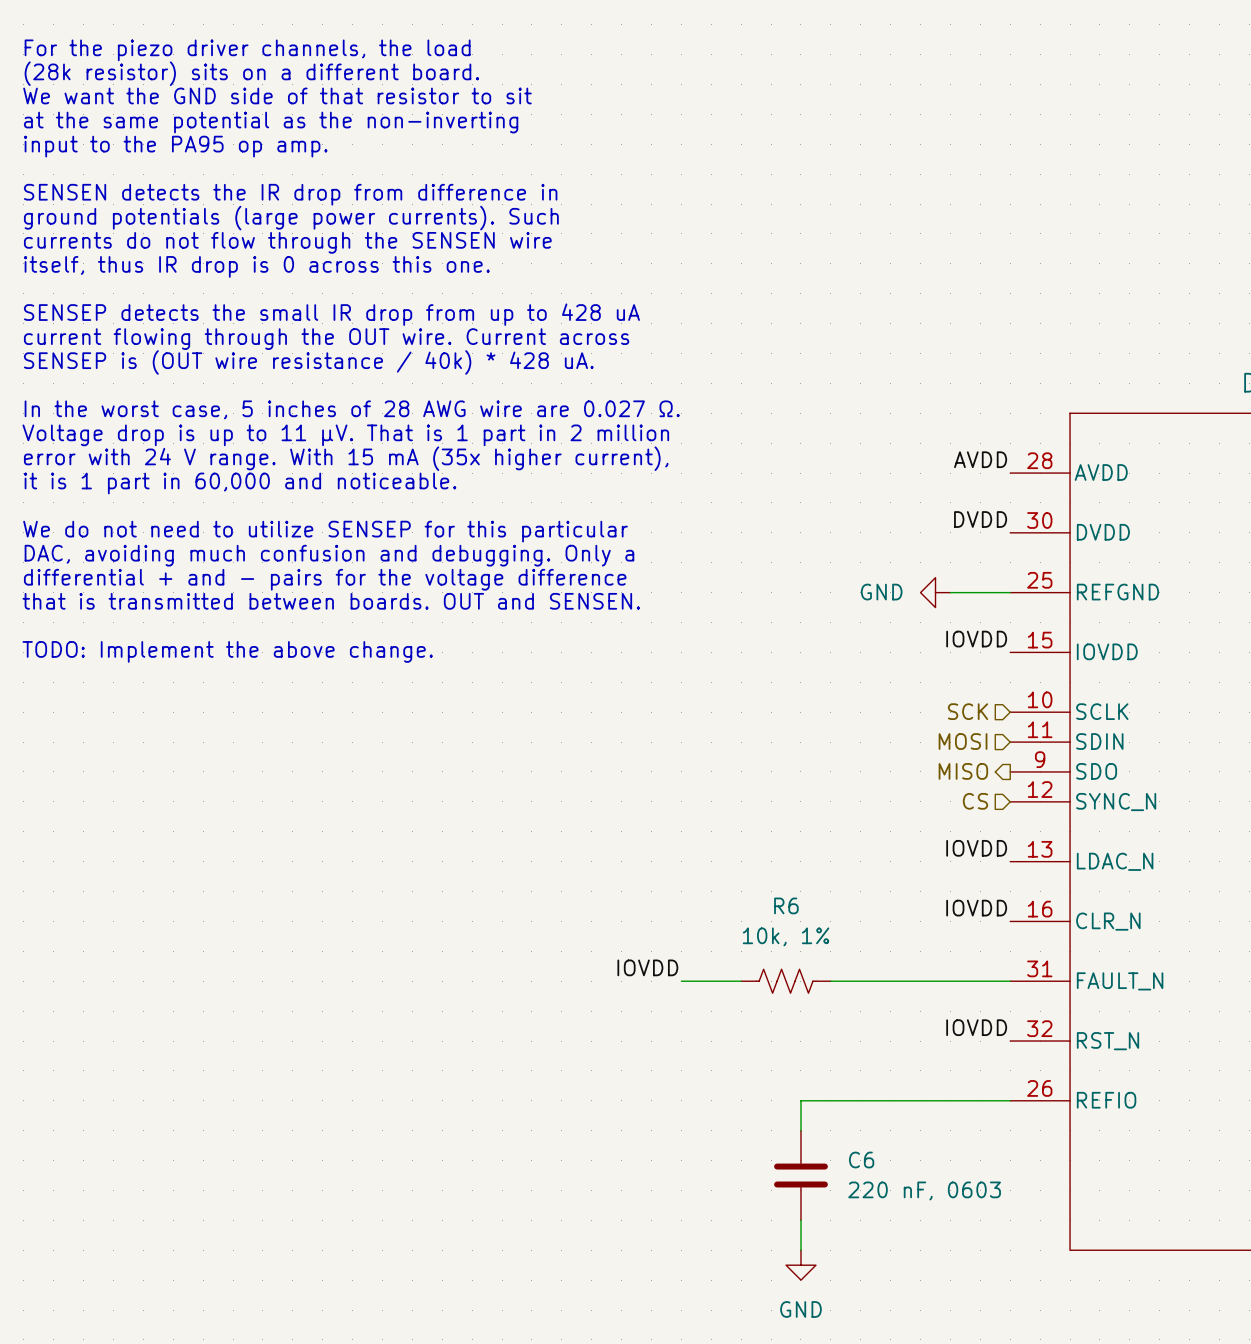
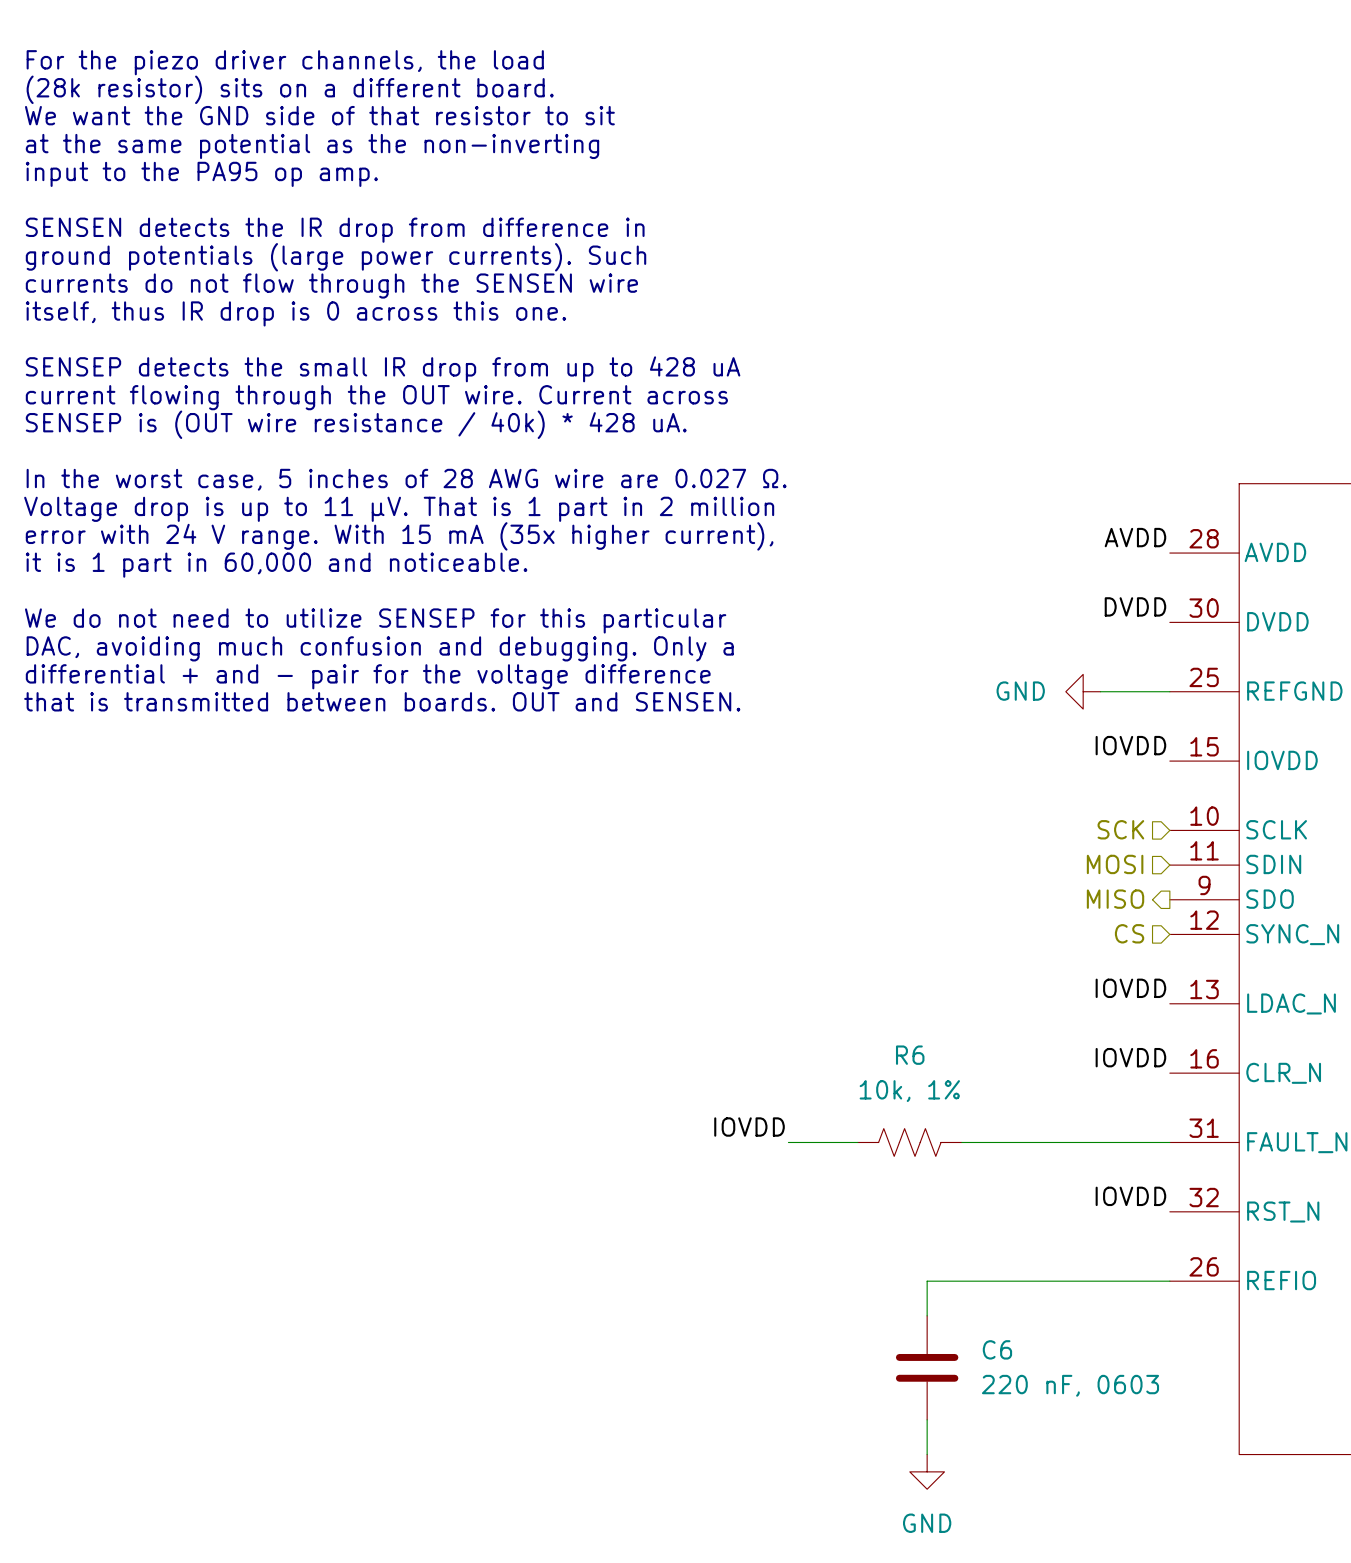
text: differential + and - pairs for the voltage difference (325, 579) -> differential + and - pair for the voltage difference (368, 676)
text: TODO: Implement the above change. (227, 651) -> none

